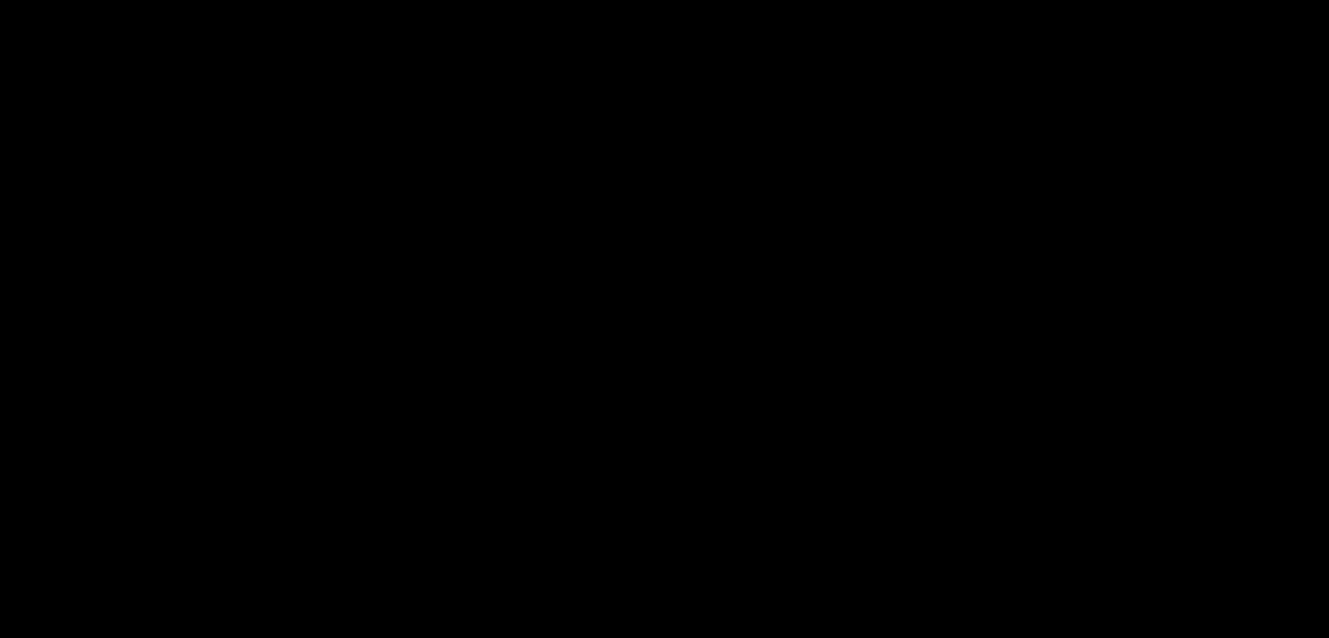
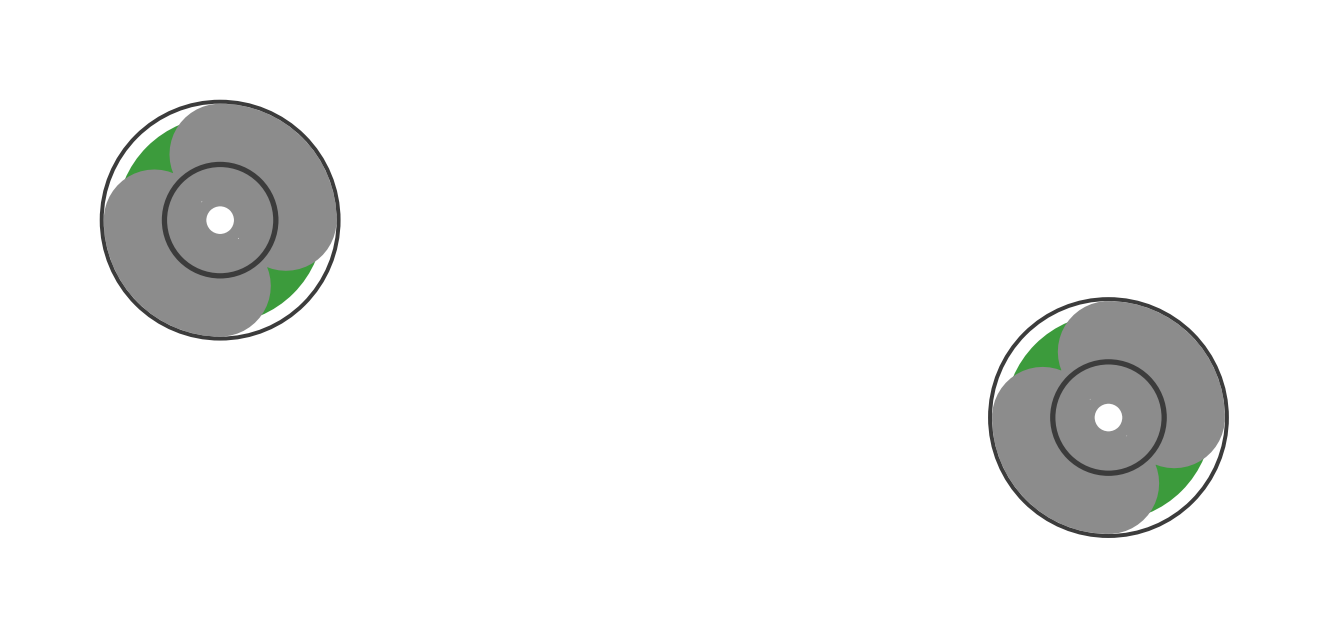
part: none -> (220, 220)
part: none -> (1108, 417)

